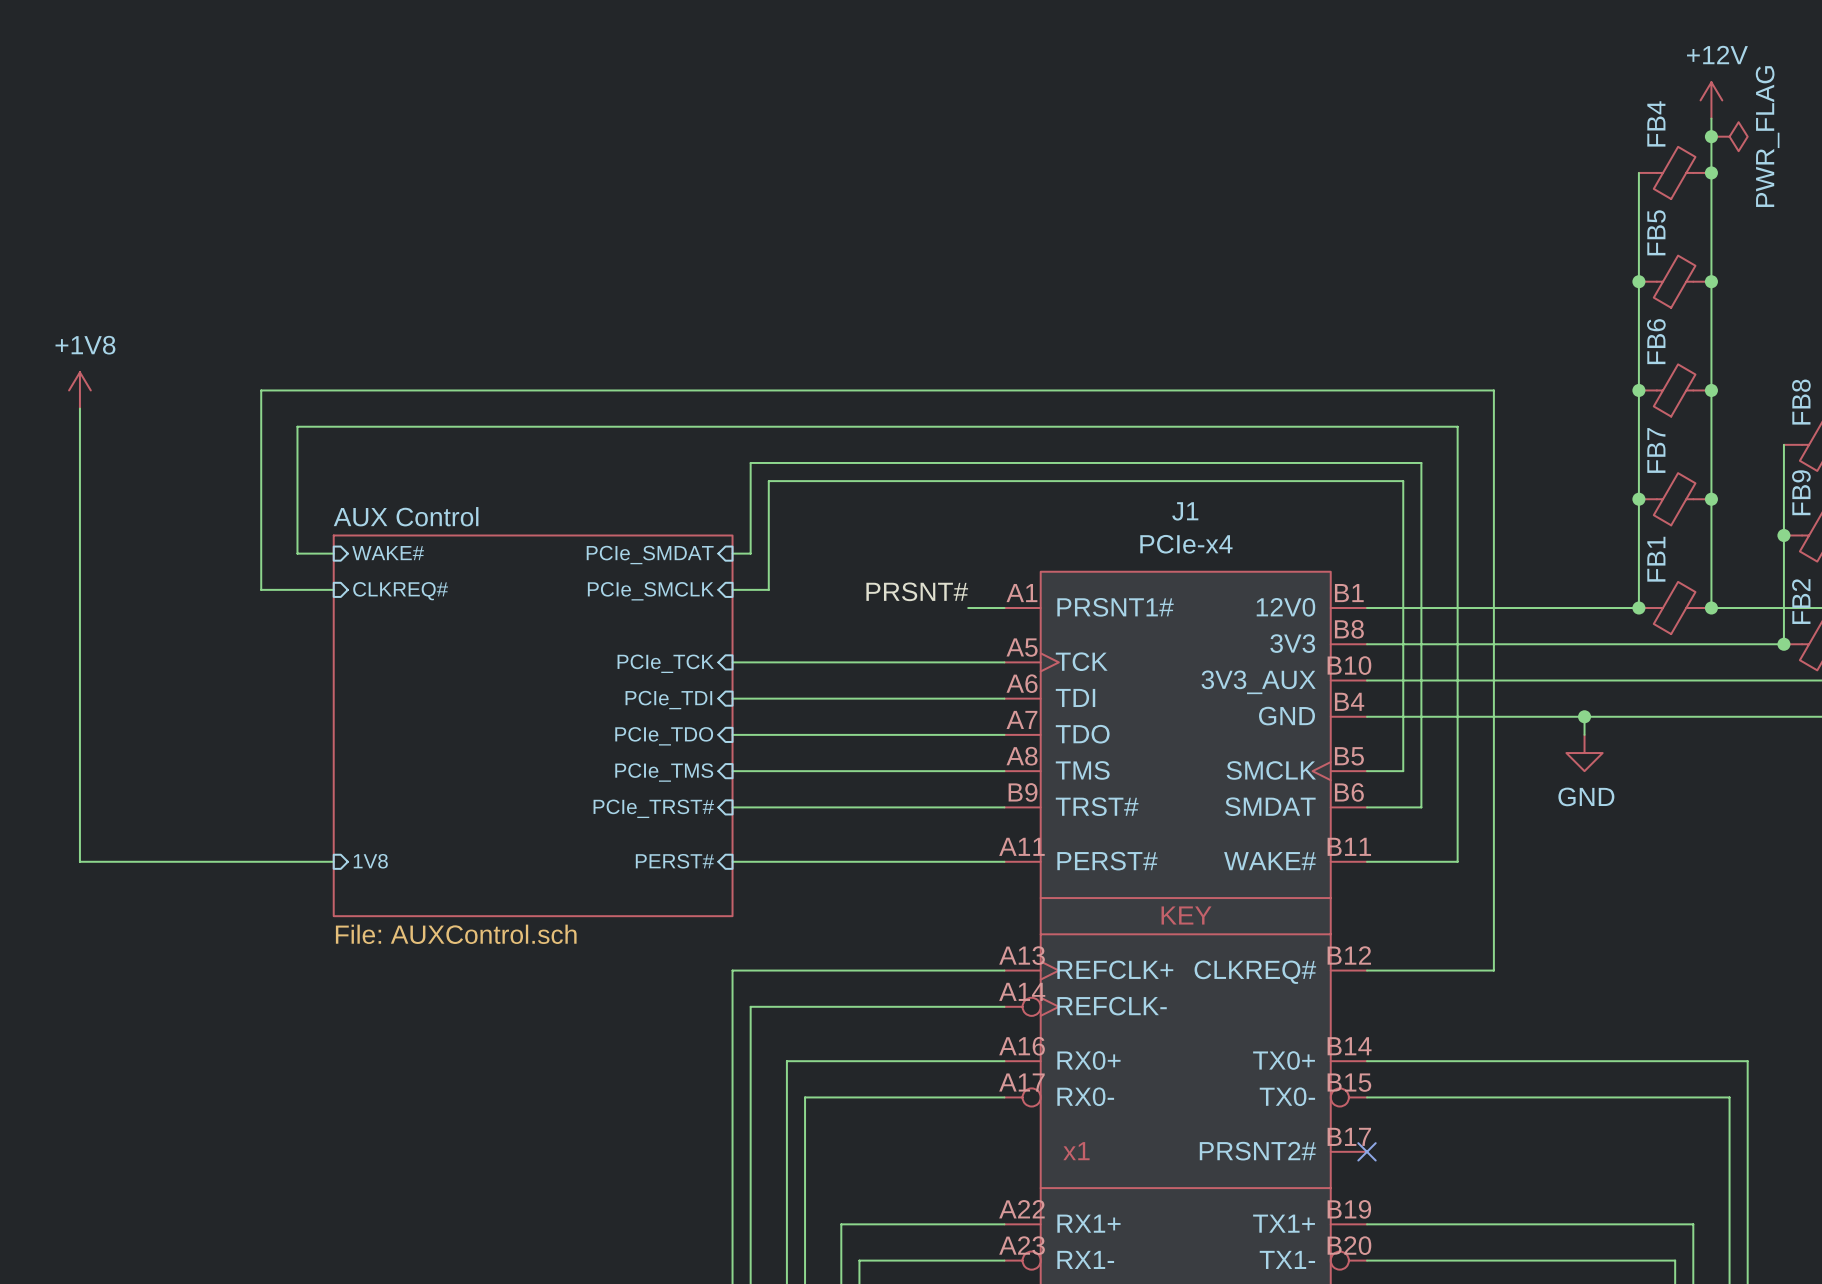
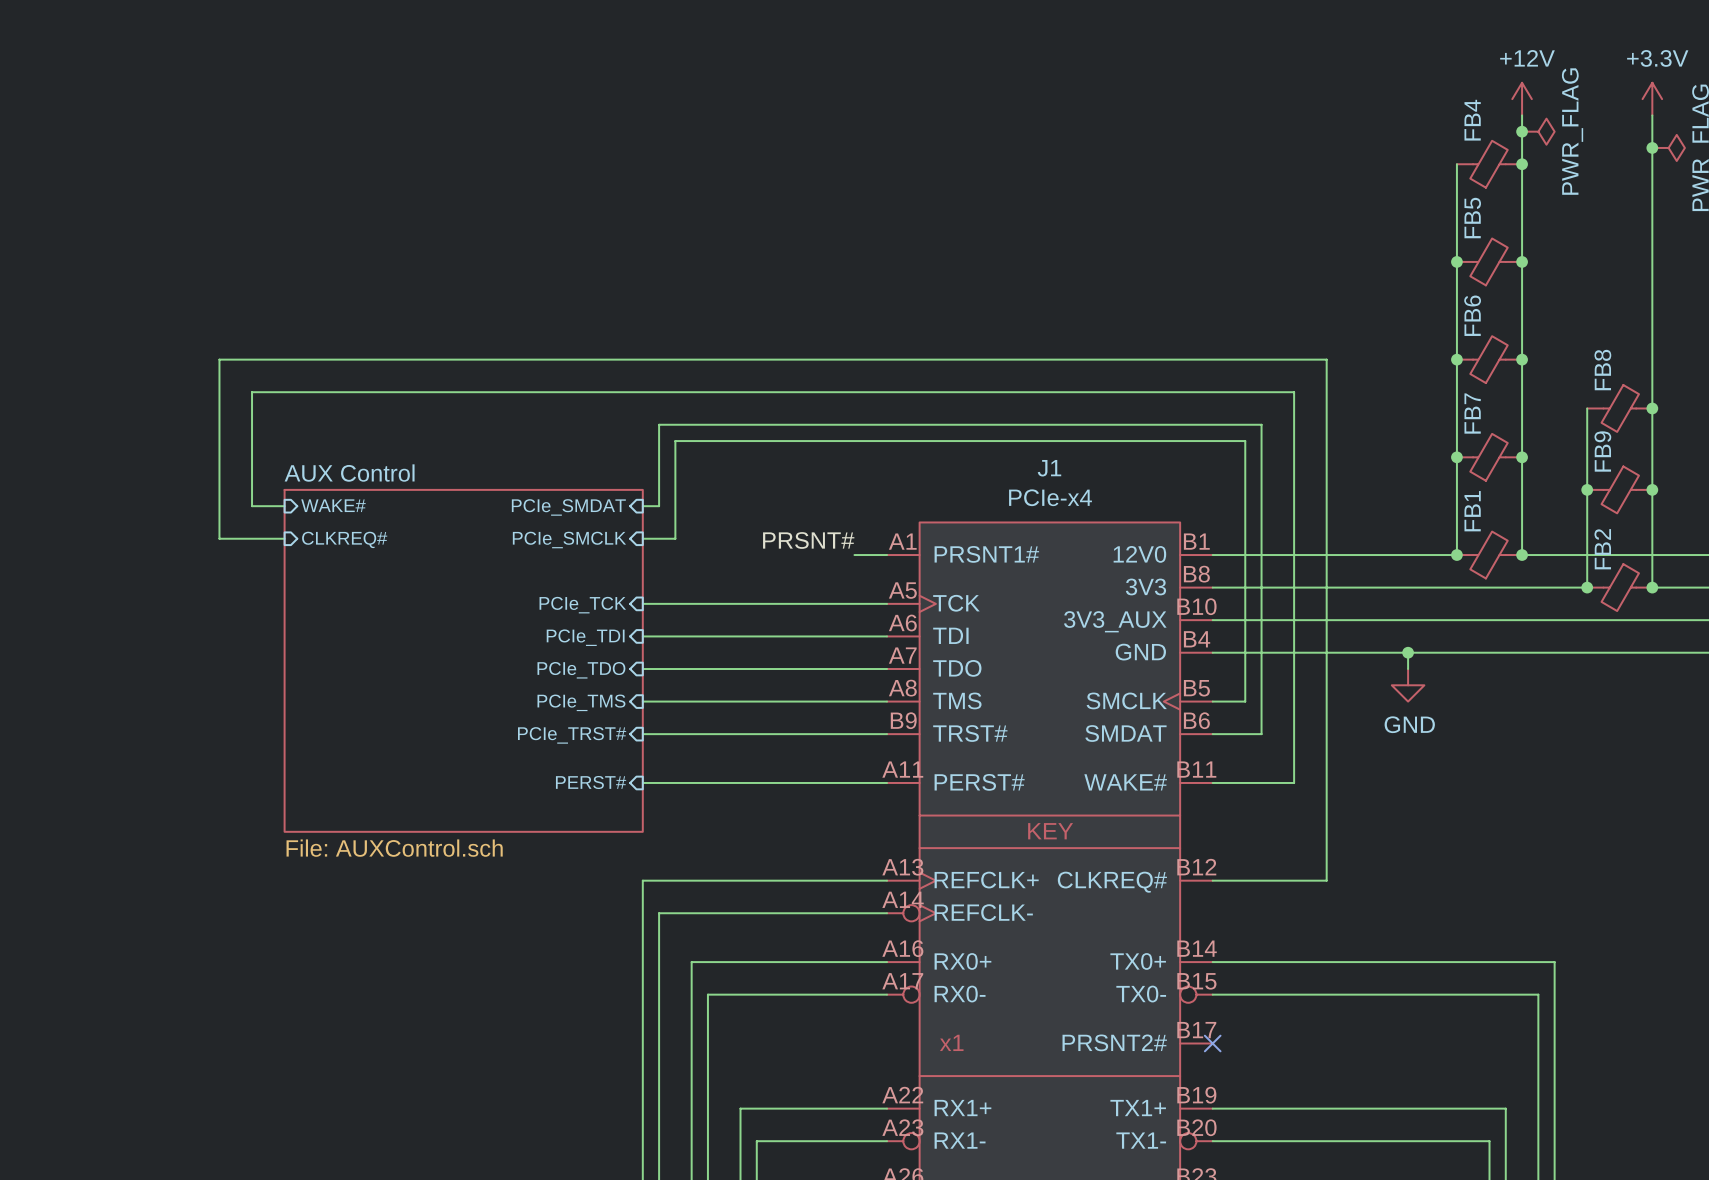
power symbol: +1V8 (79, 390) -> none
wire: (79, 408) (79, 861) (333, 861) -> none
sheet pin: 1V8 (370, 861) -> none

